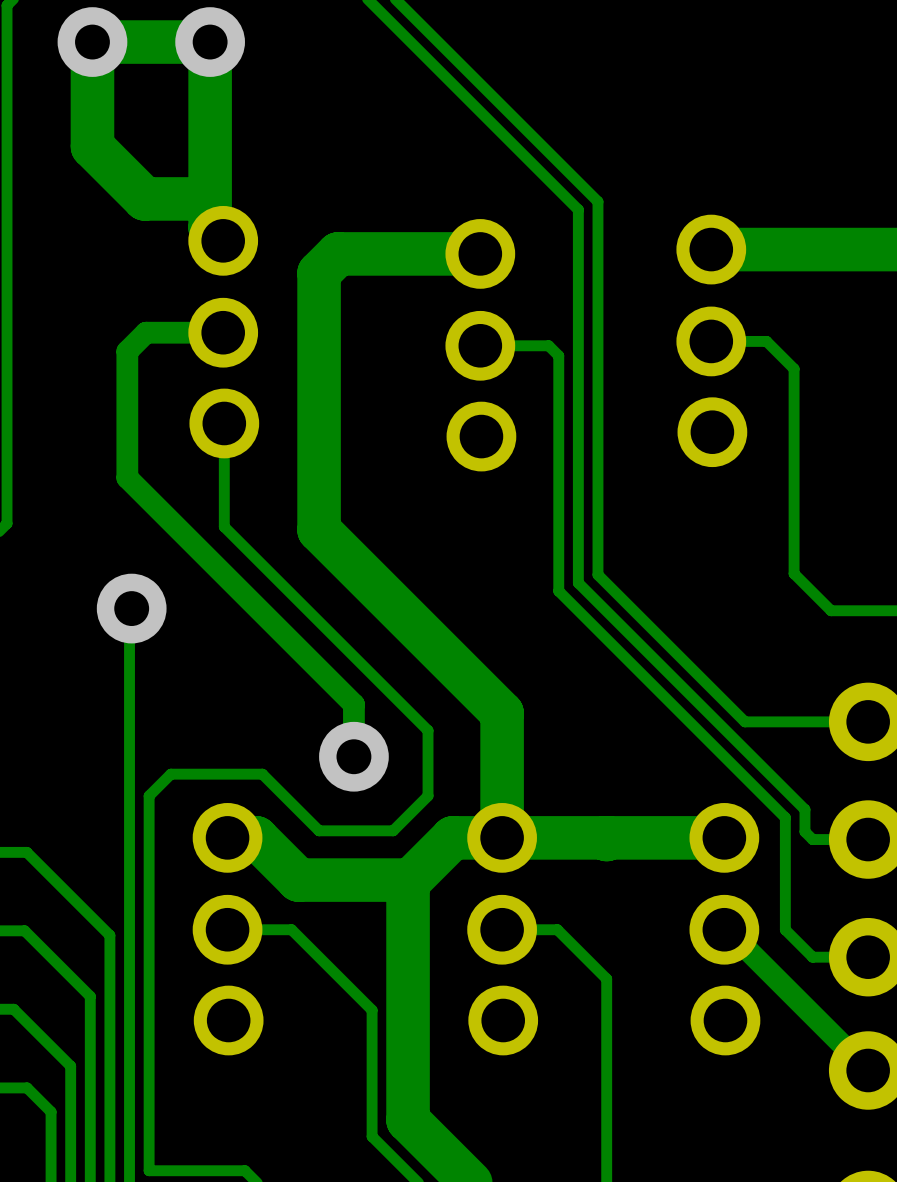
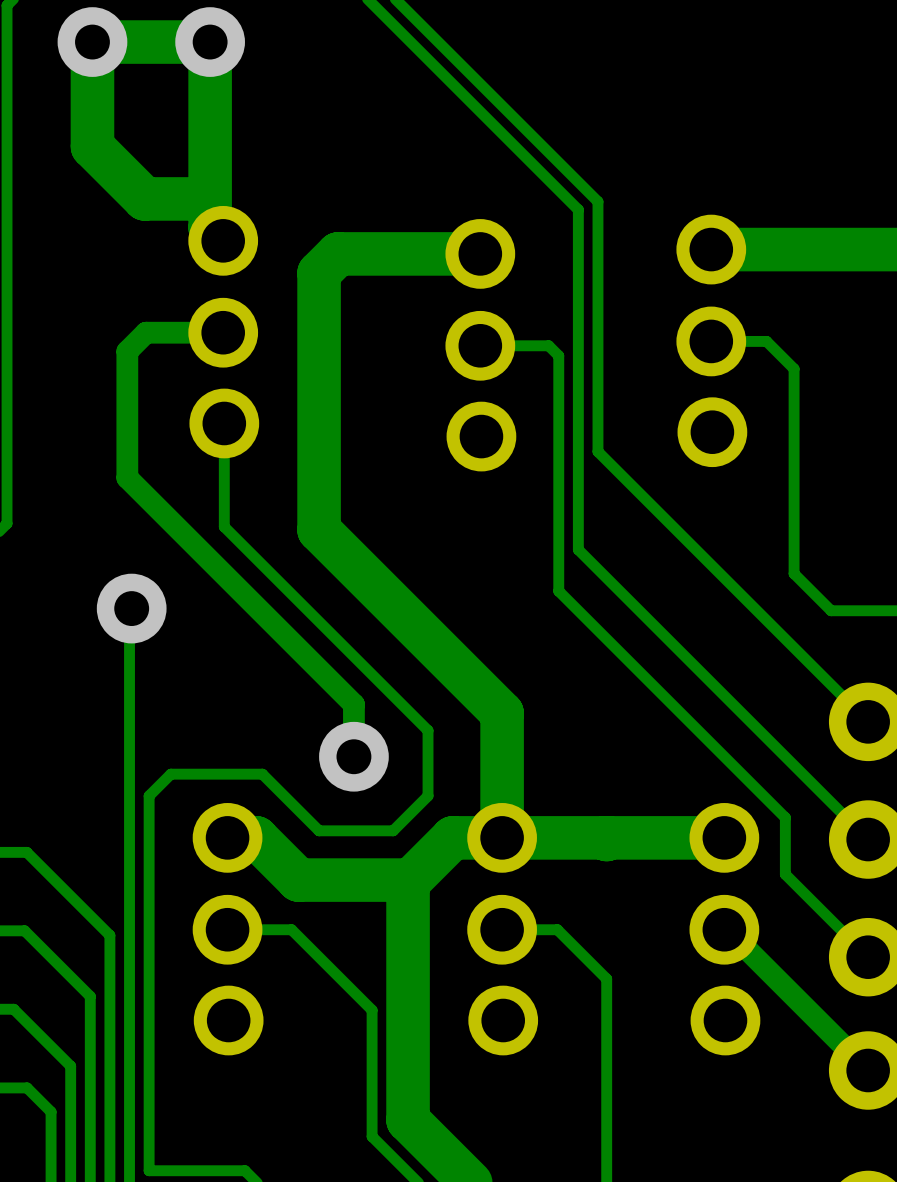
track: (597, 451) (597, 574) (744, 721) (868, 721) -> (597, 451) (868, 721)
track: (578, 549) (578, 583) (804, 809) (804, 831) (812, 839) (868, 839) -> (578, 549) (868, 839)
track: (785, 874) (785, 929) (812, 957) (868, 957) -> (785, 874) (868, 957)

